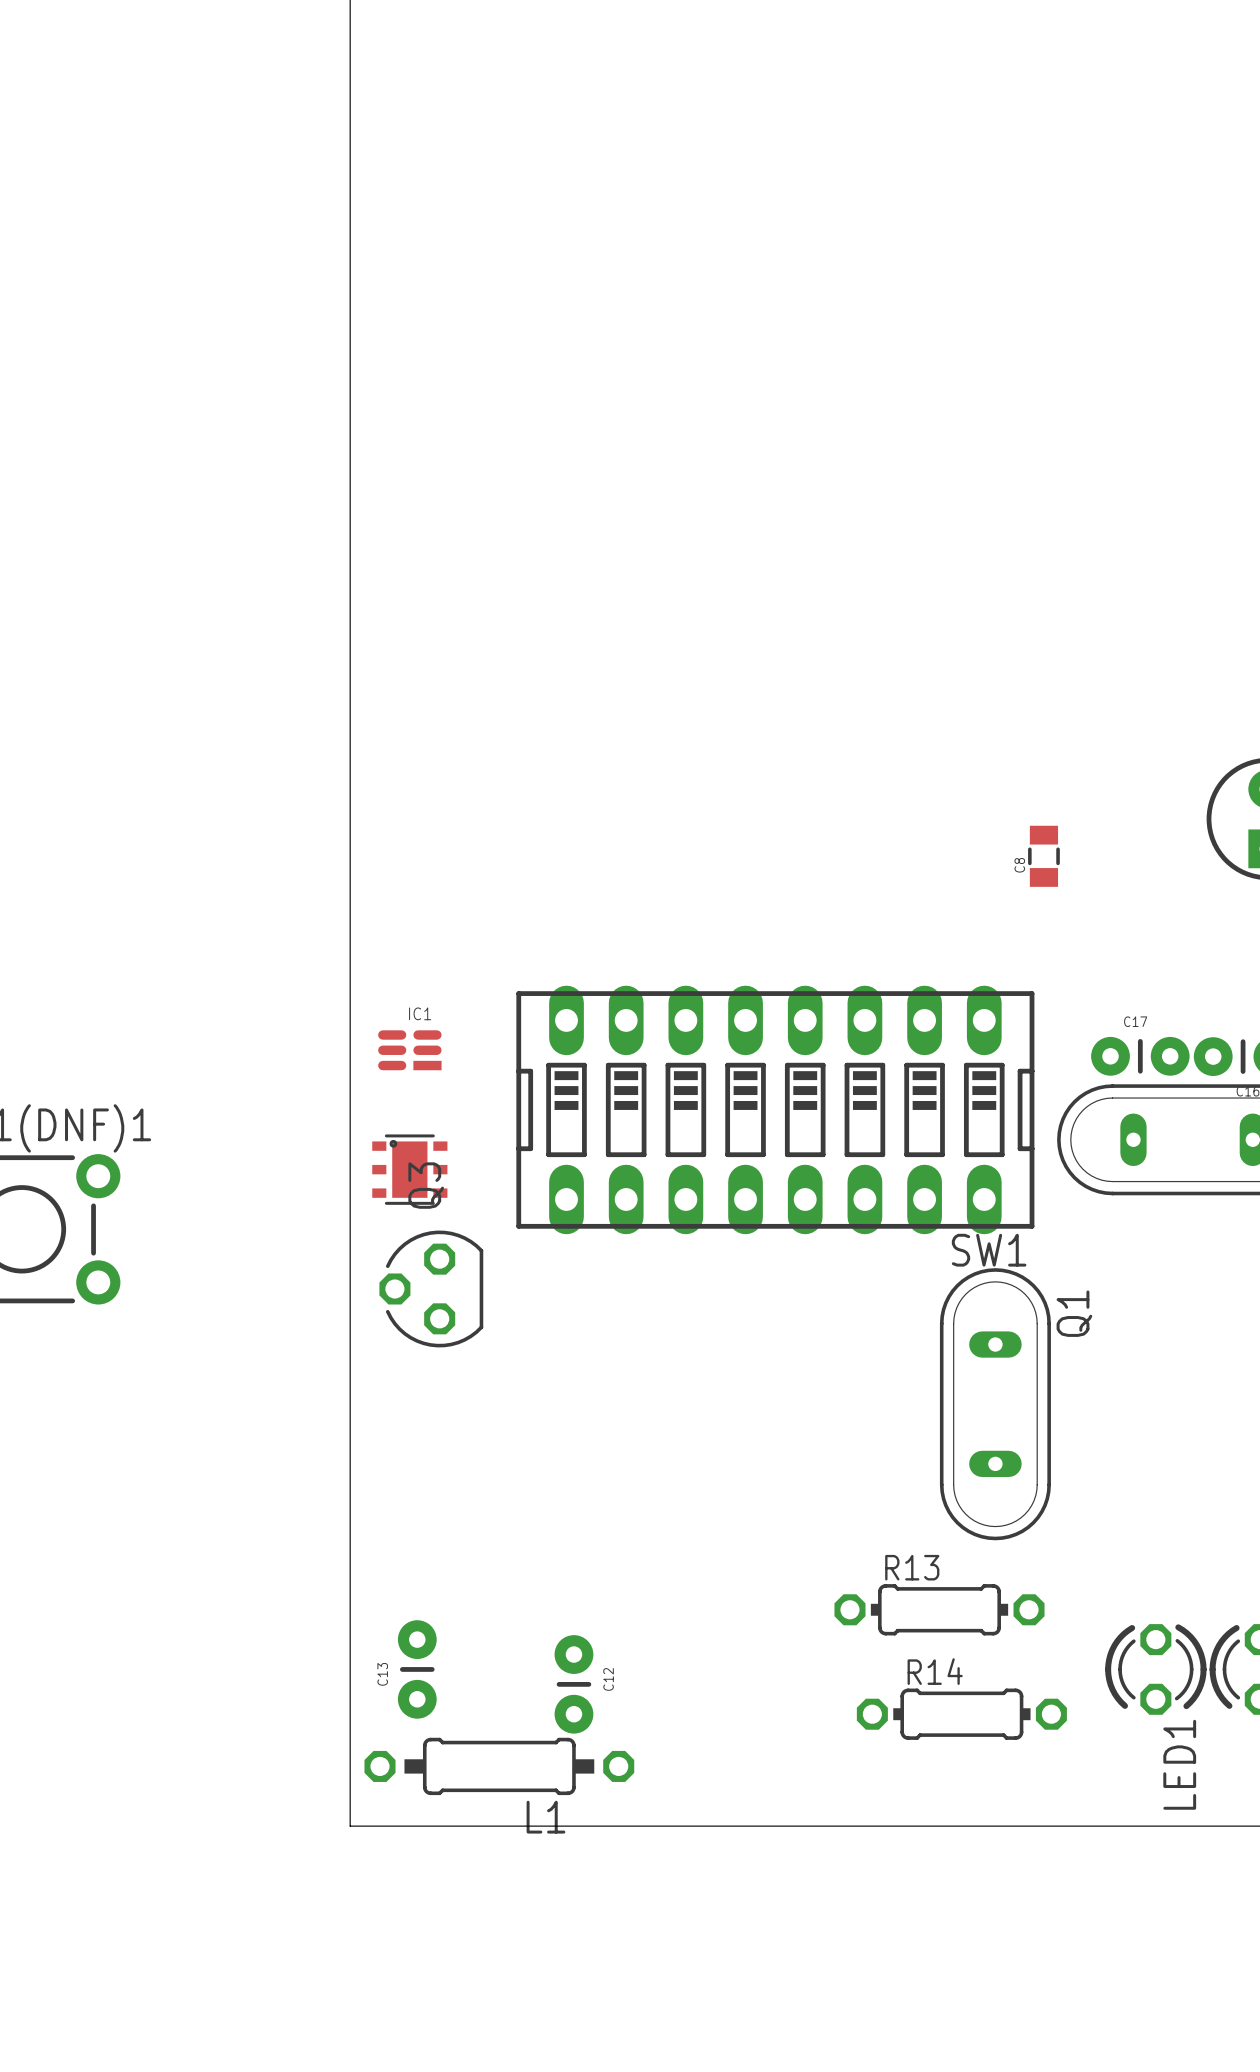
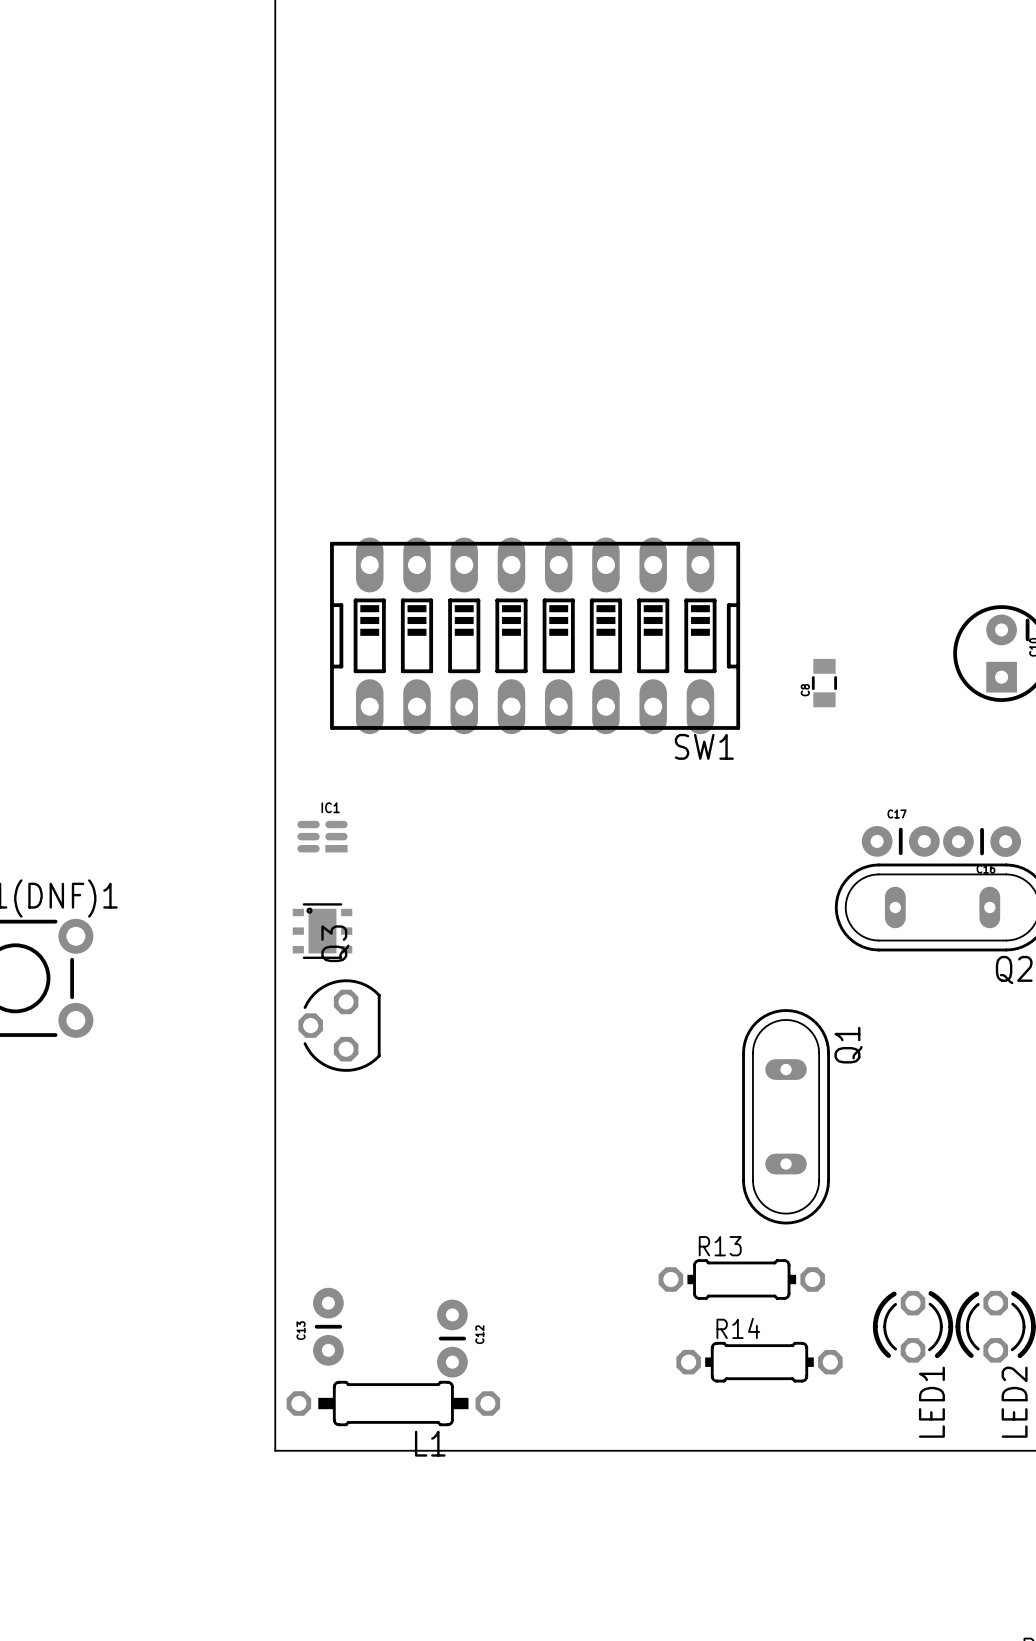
SW1 position: (775, 1109) -> (535, 635)

